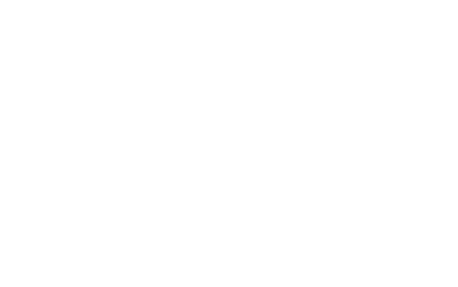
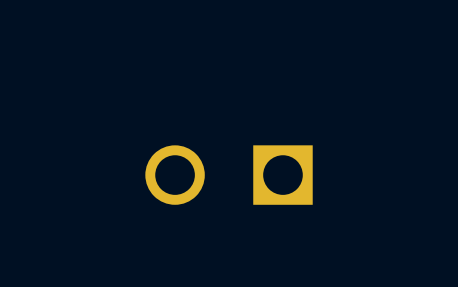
part: none -> (229, 175)

